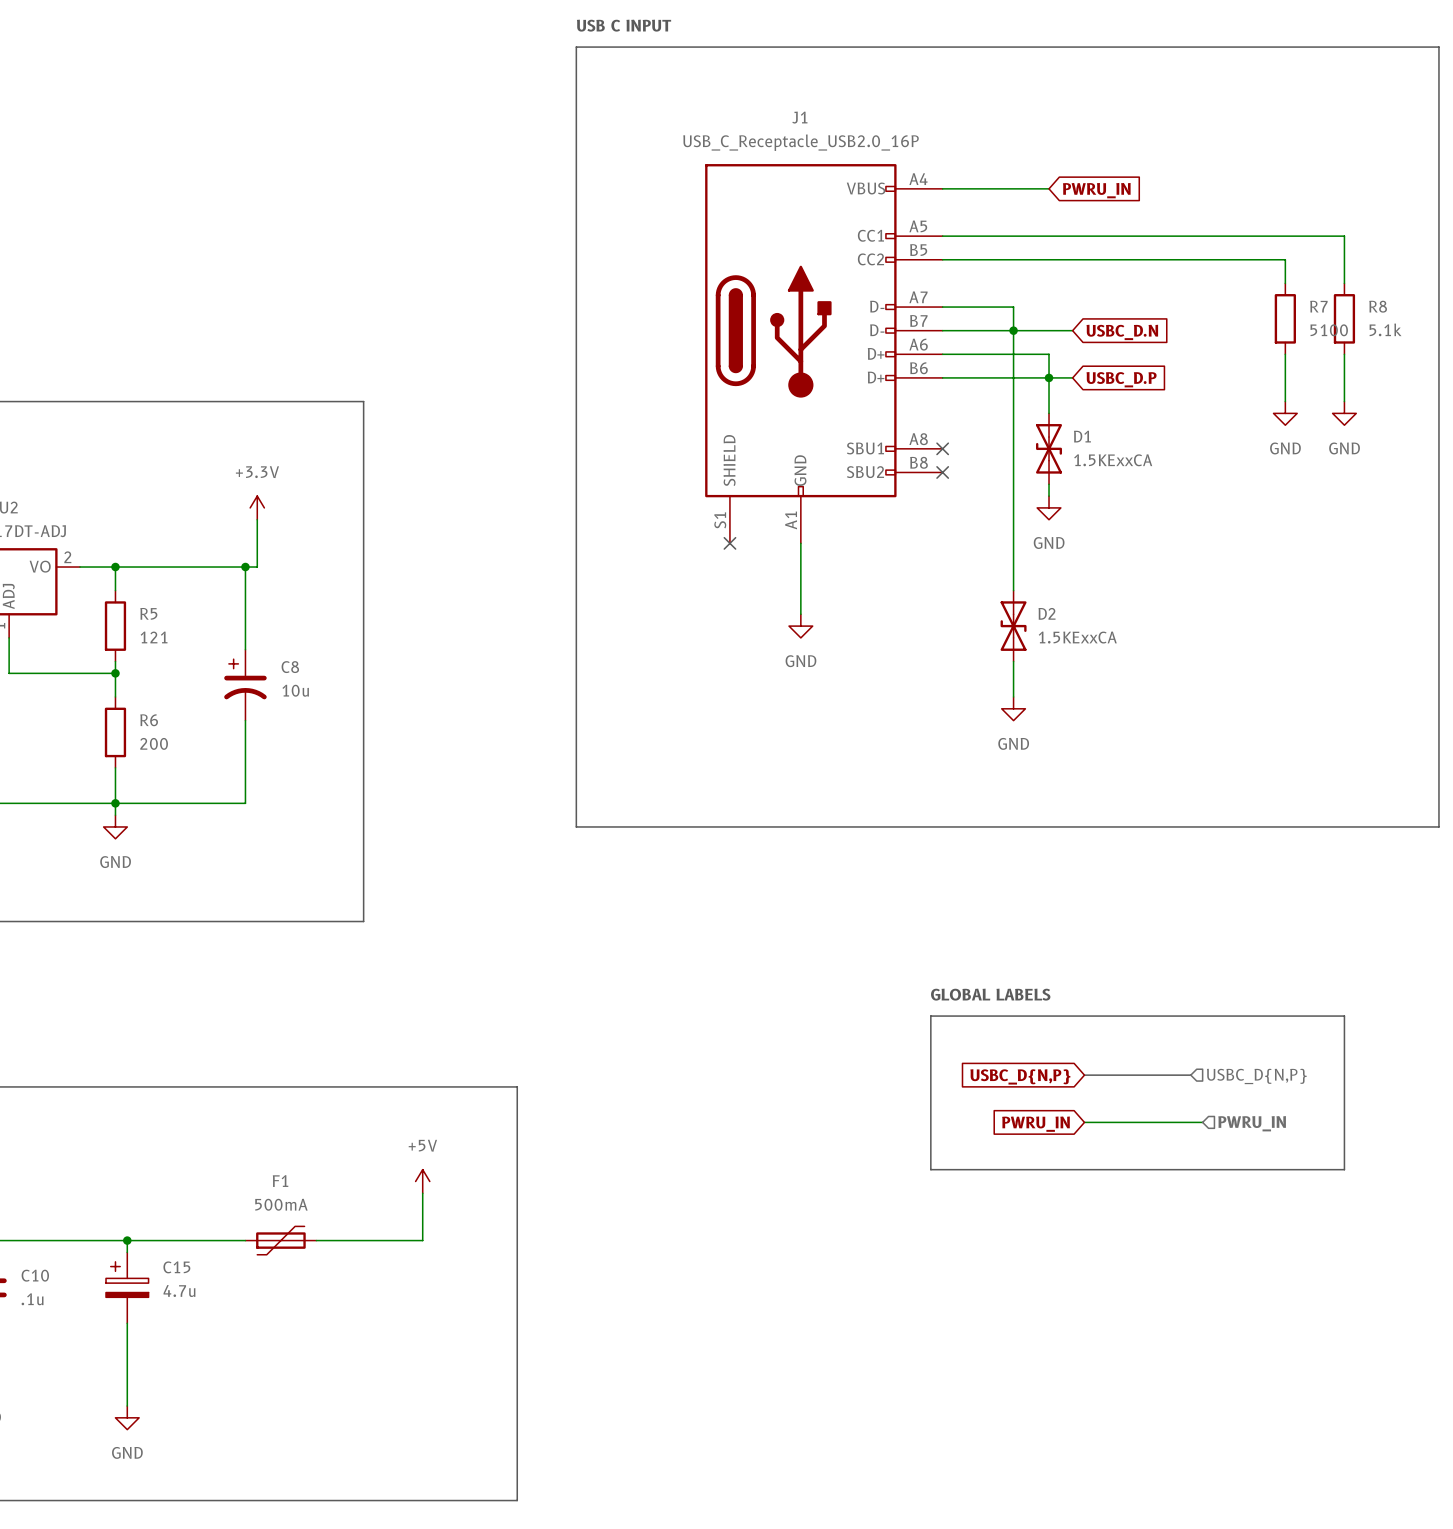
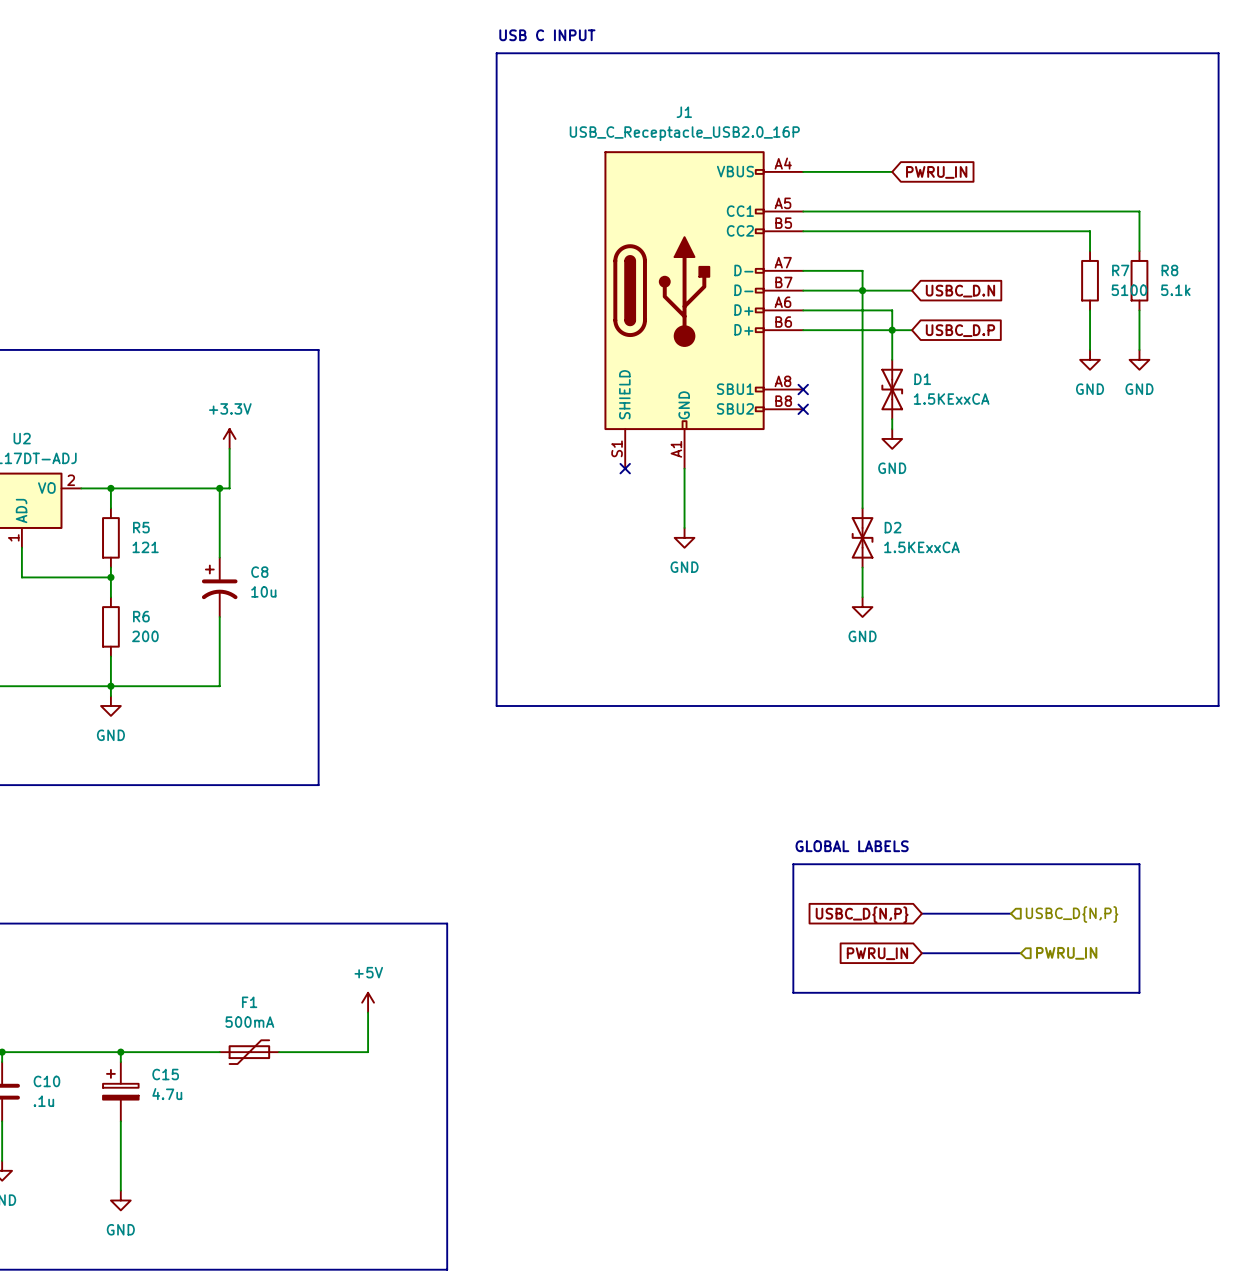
bus: none -> (921, 953) (1020, 953)

